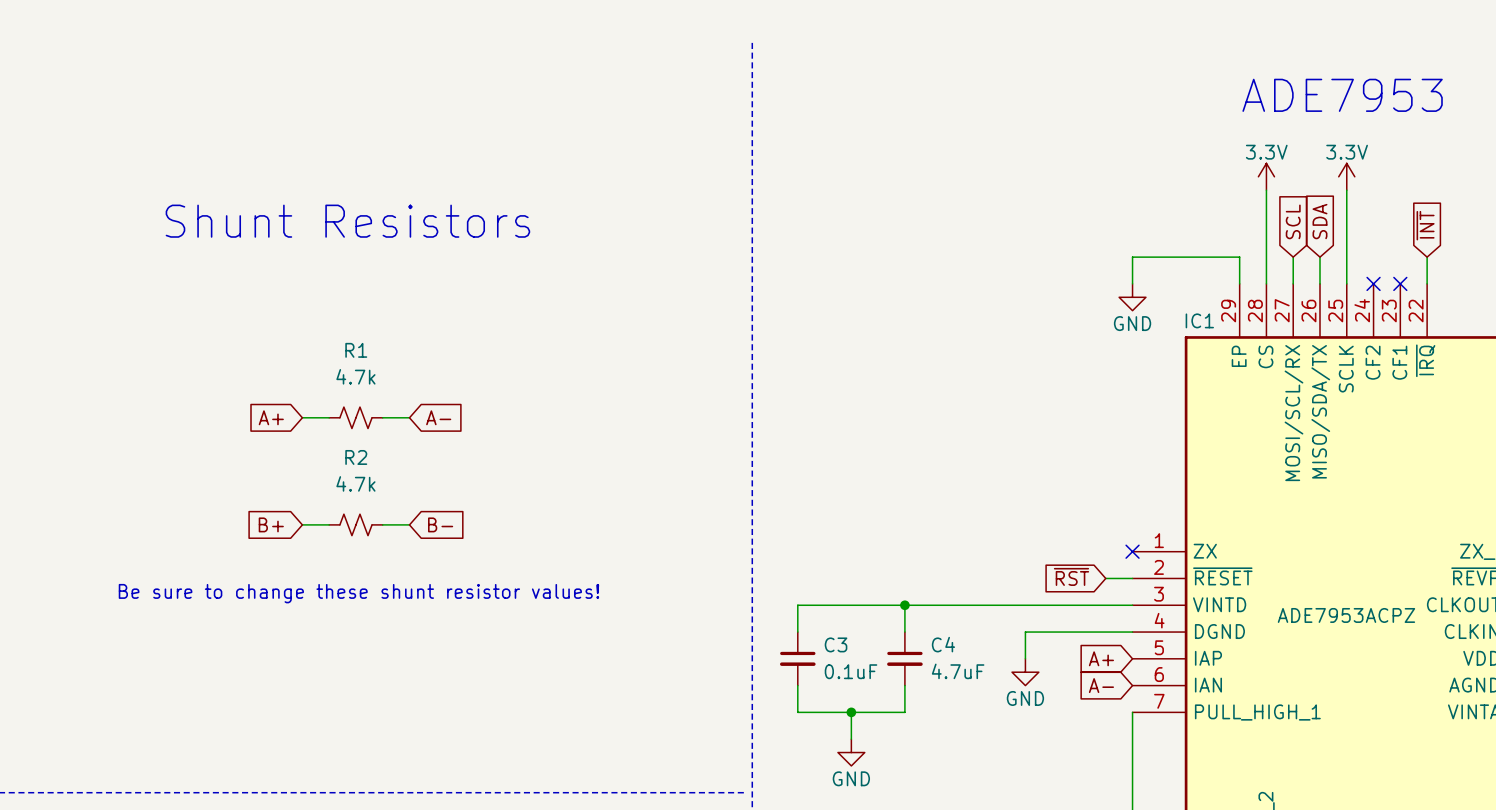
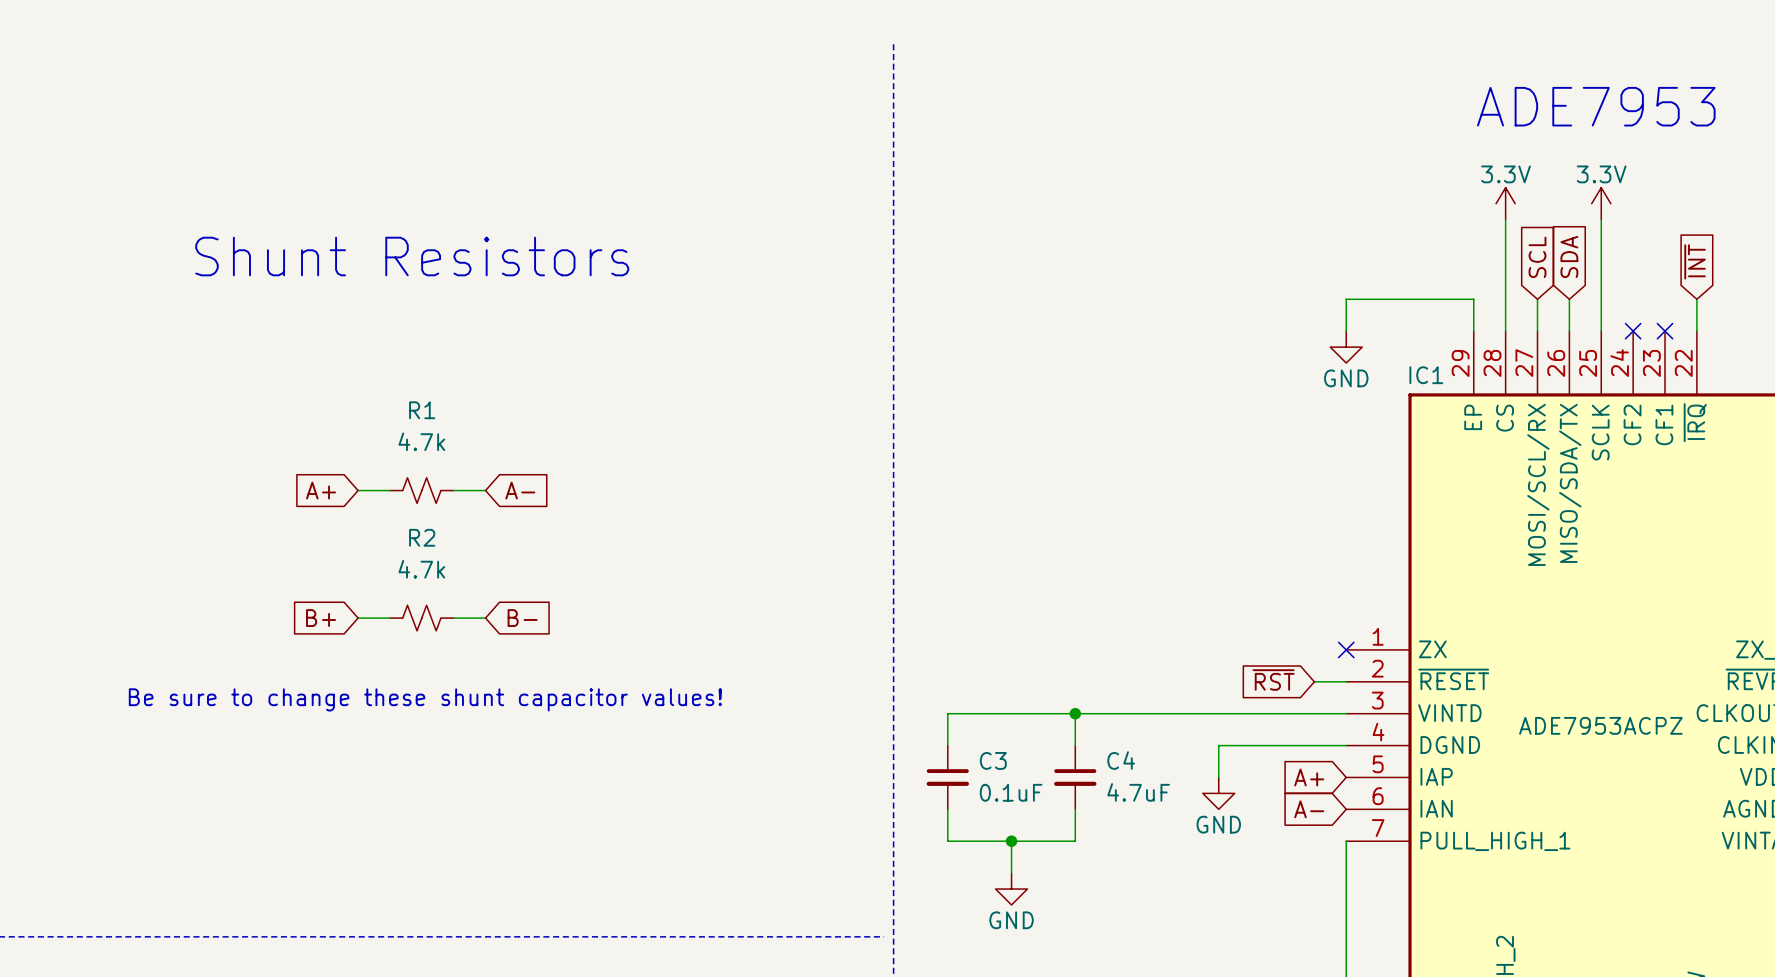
text: Be sure to change these shunt resistor values! (358, 593) -> Be sure to change these shunt capacitor values! (425, 699)

